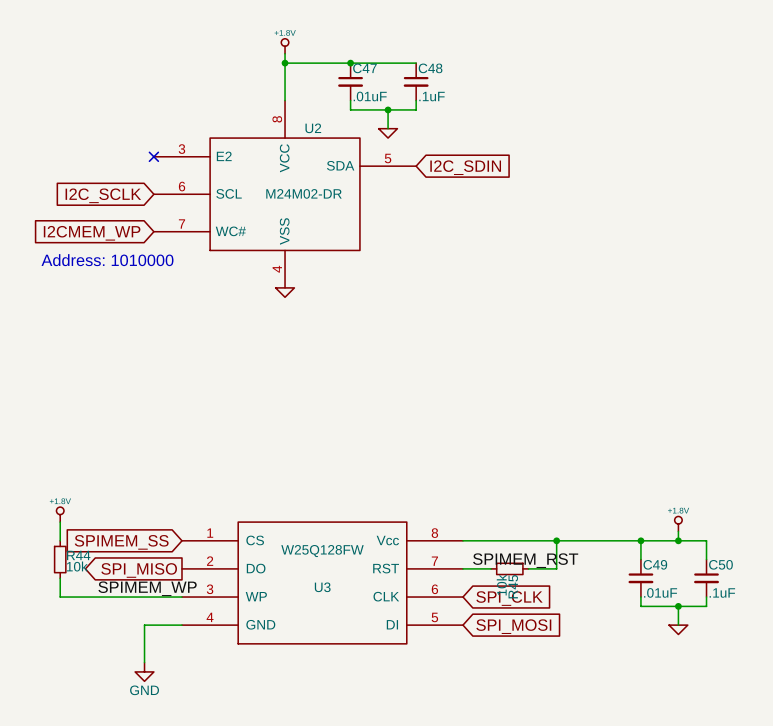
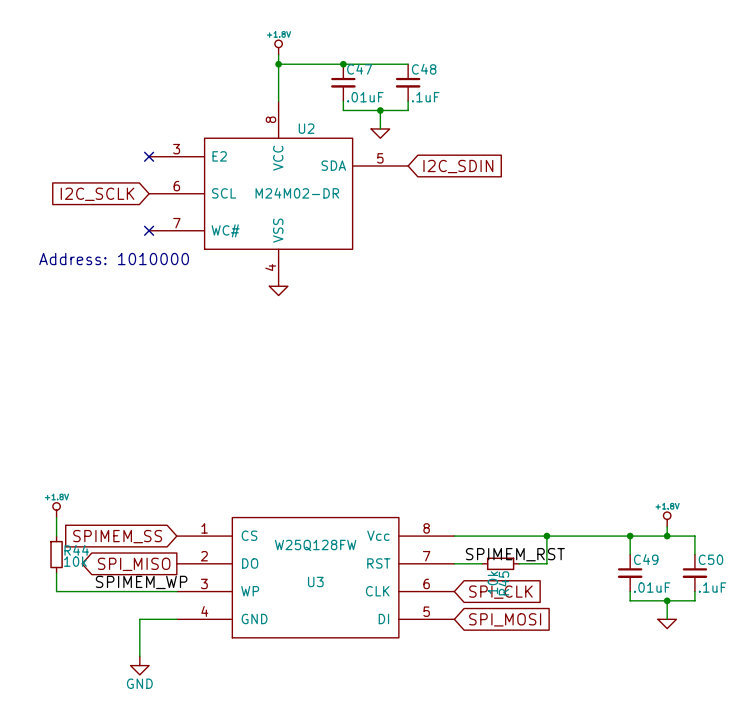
no-connect mark: none -> (149, 230)
global label: I2CMEM_WP (92, 233) -> none

